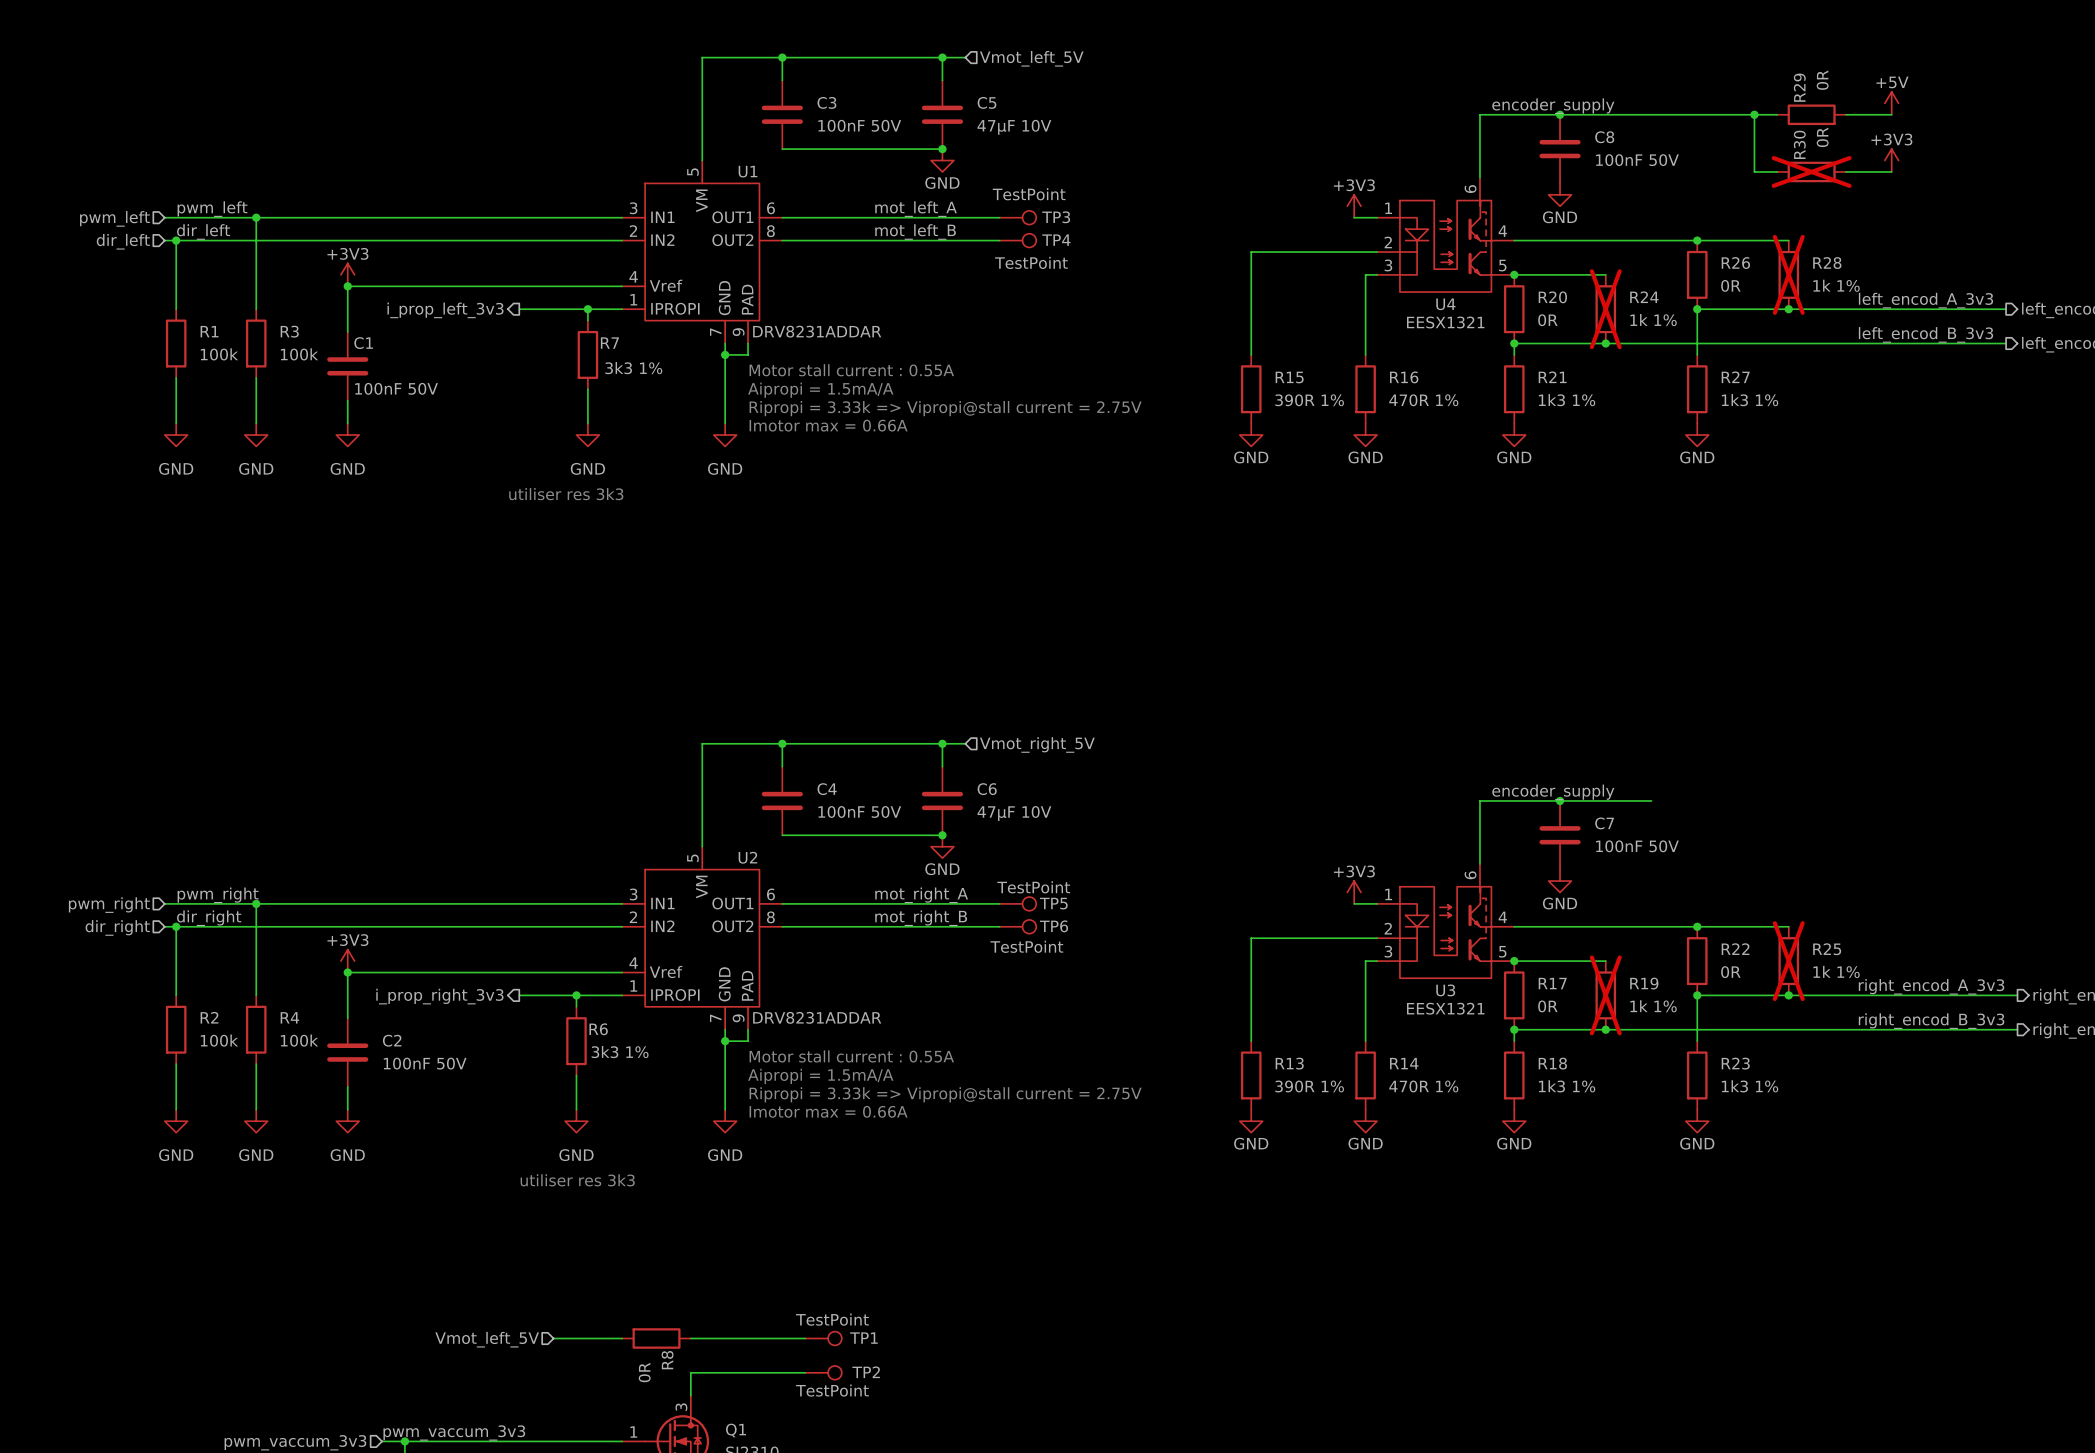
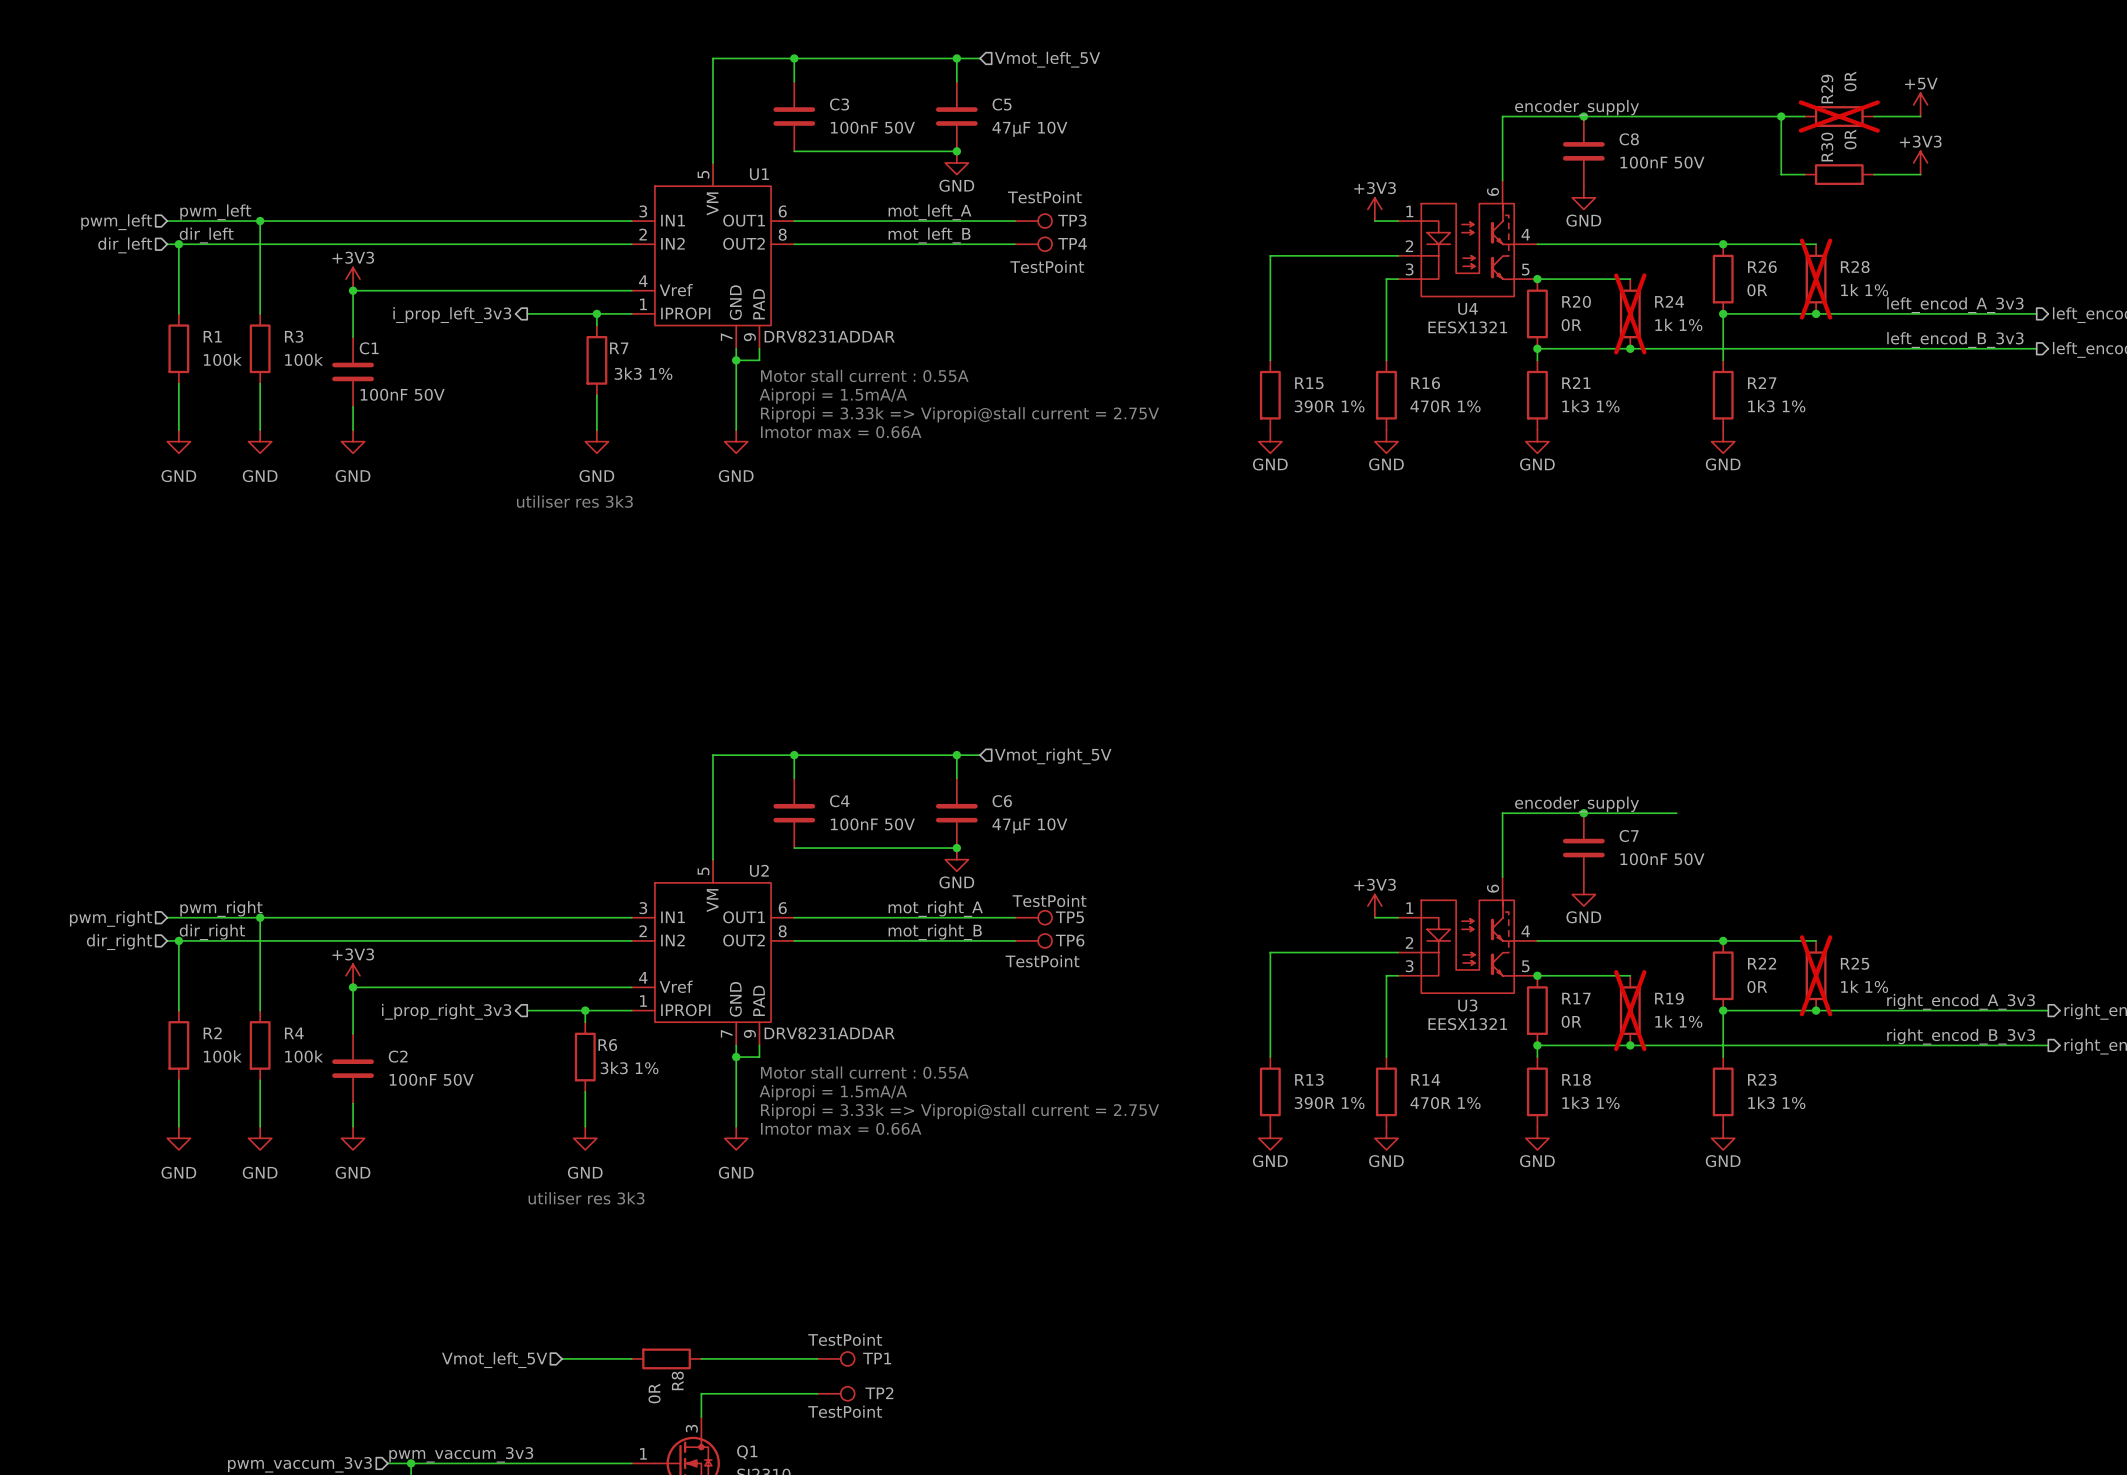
R29 do-not-place cross: none -> (1839, 116)
R30 do-not-place cross: (1811, 171) -> none

